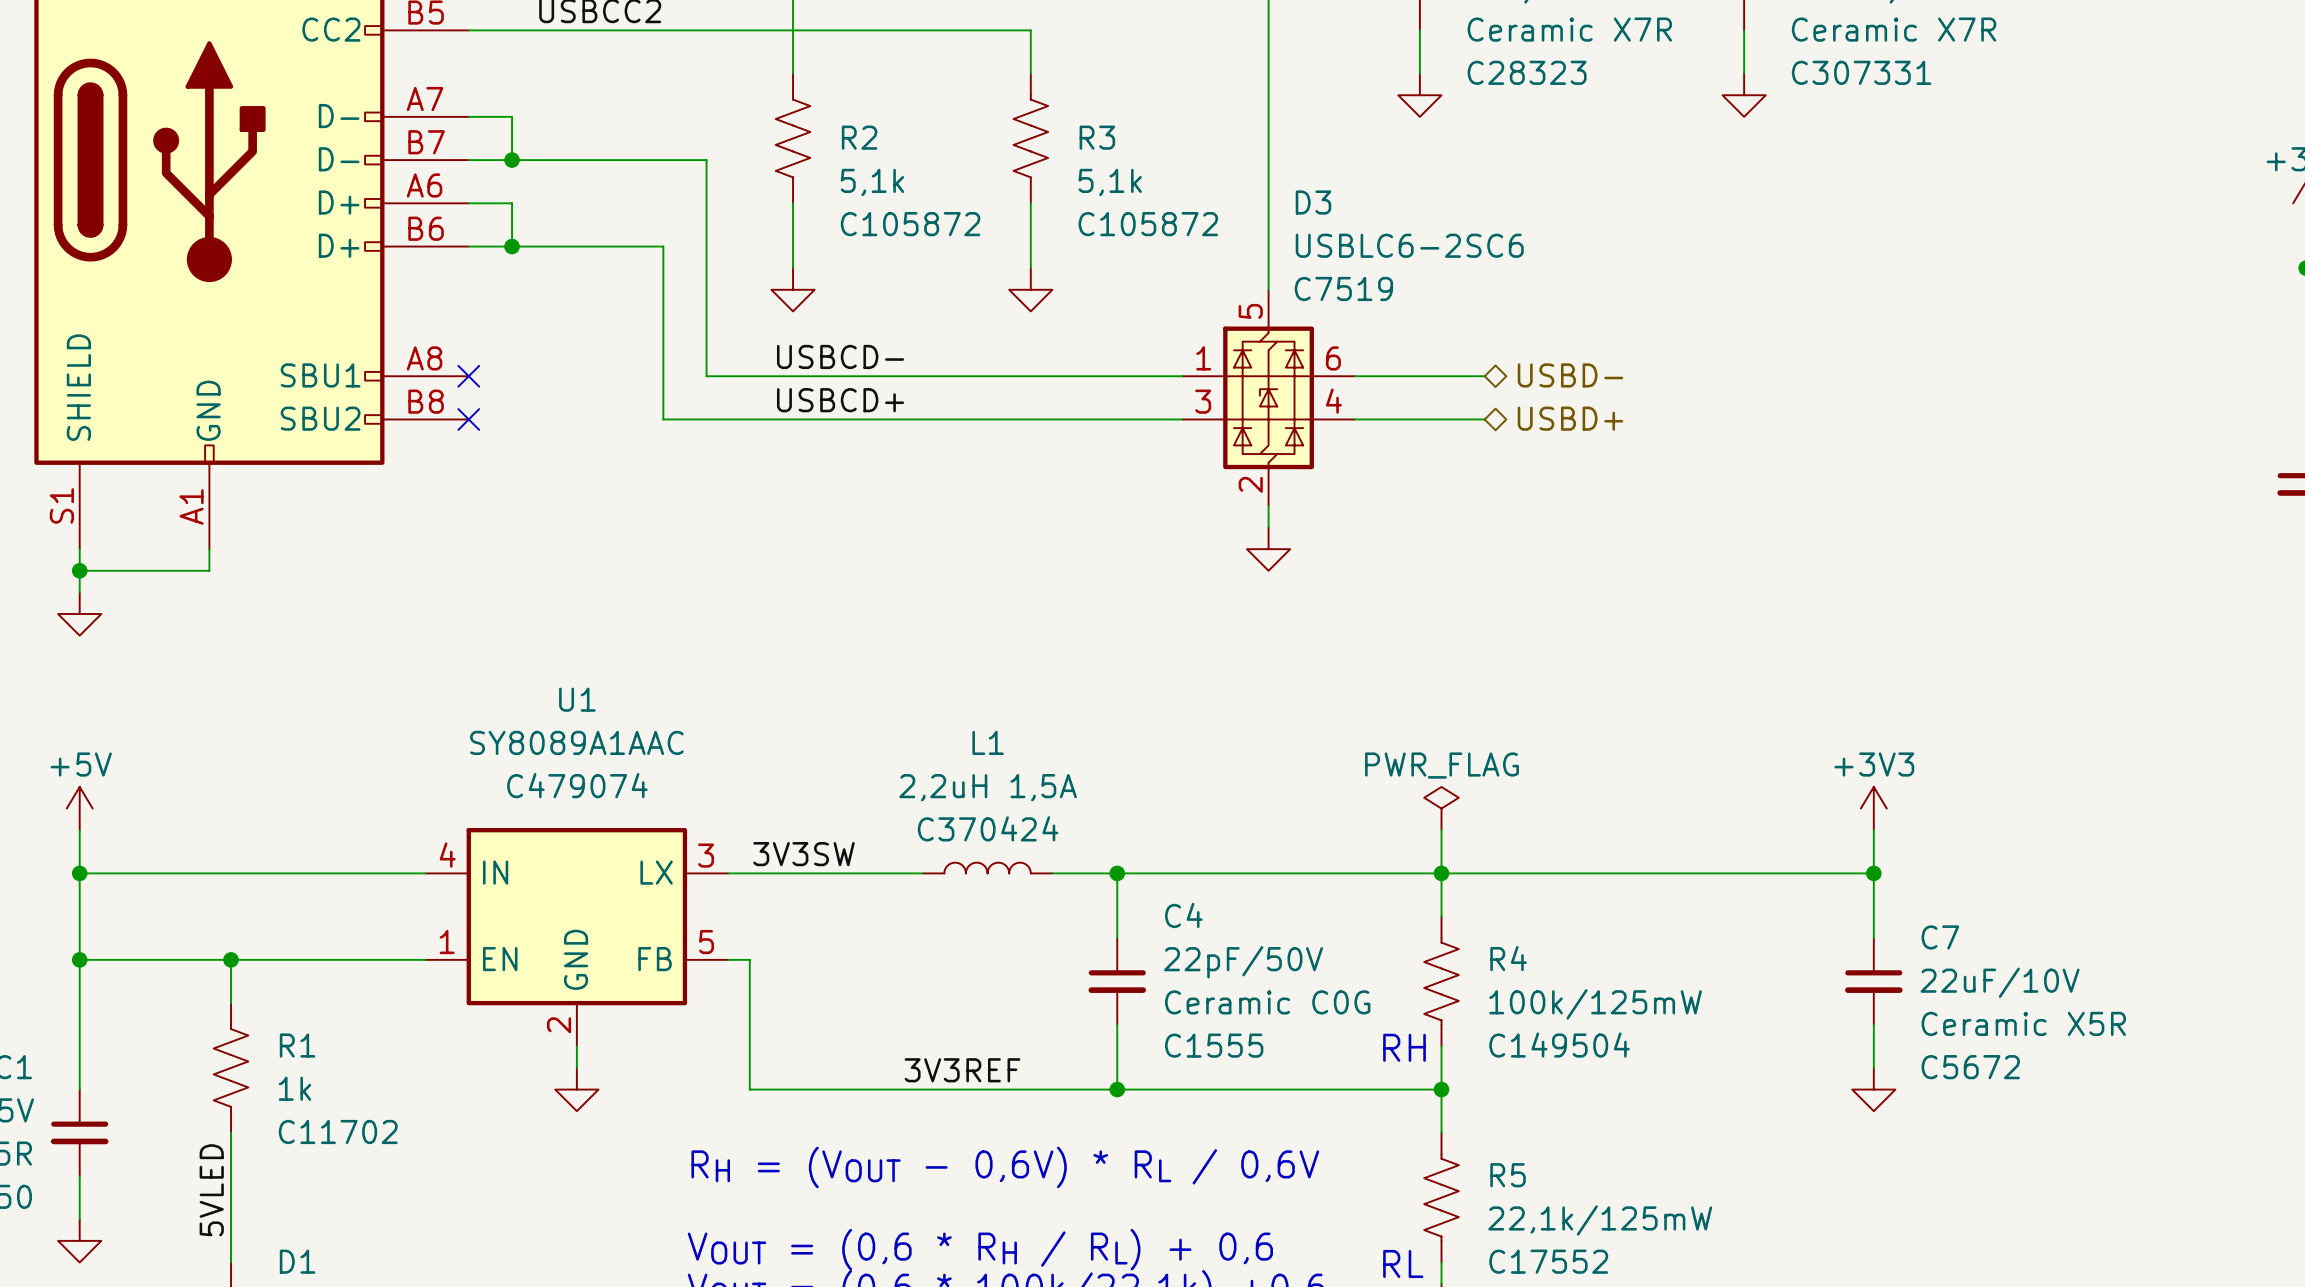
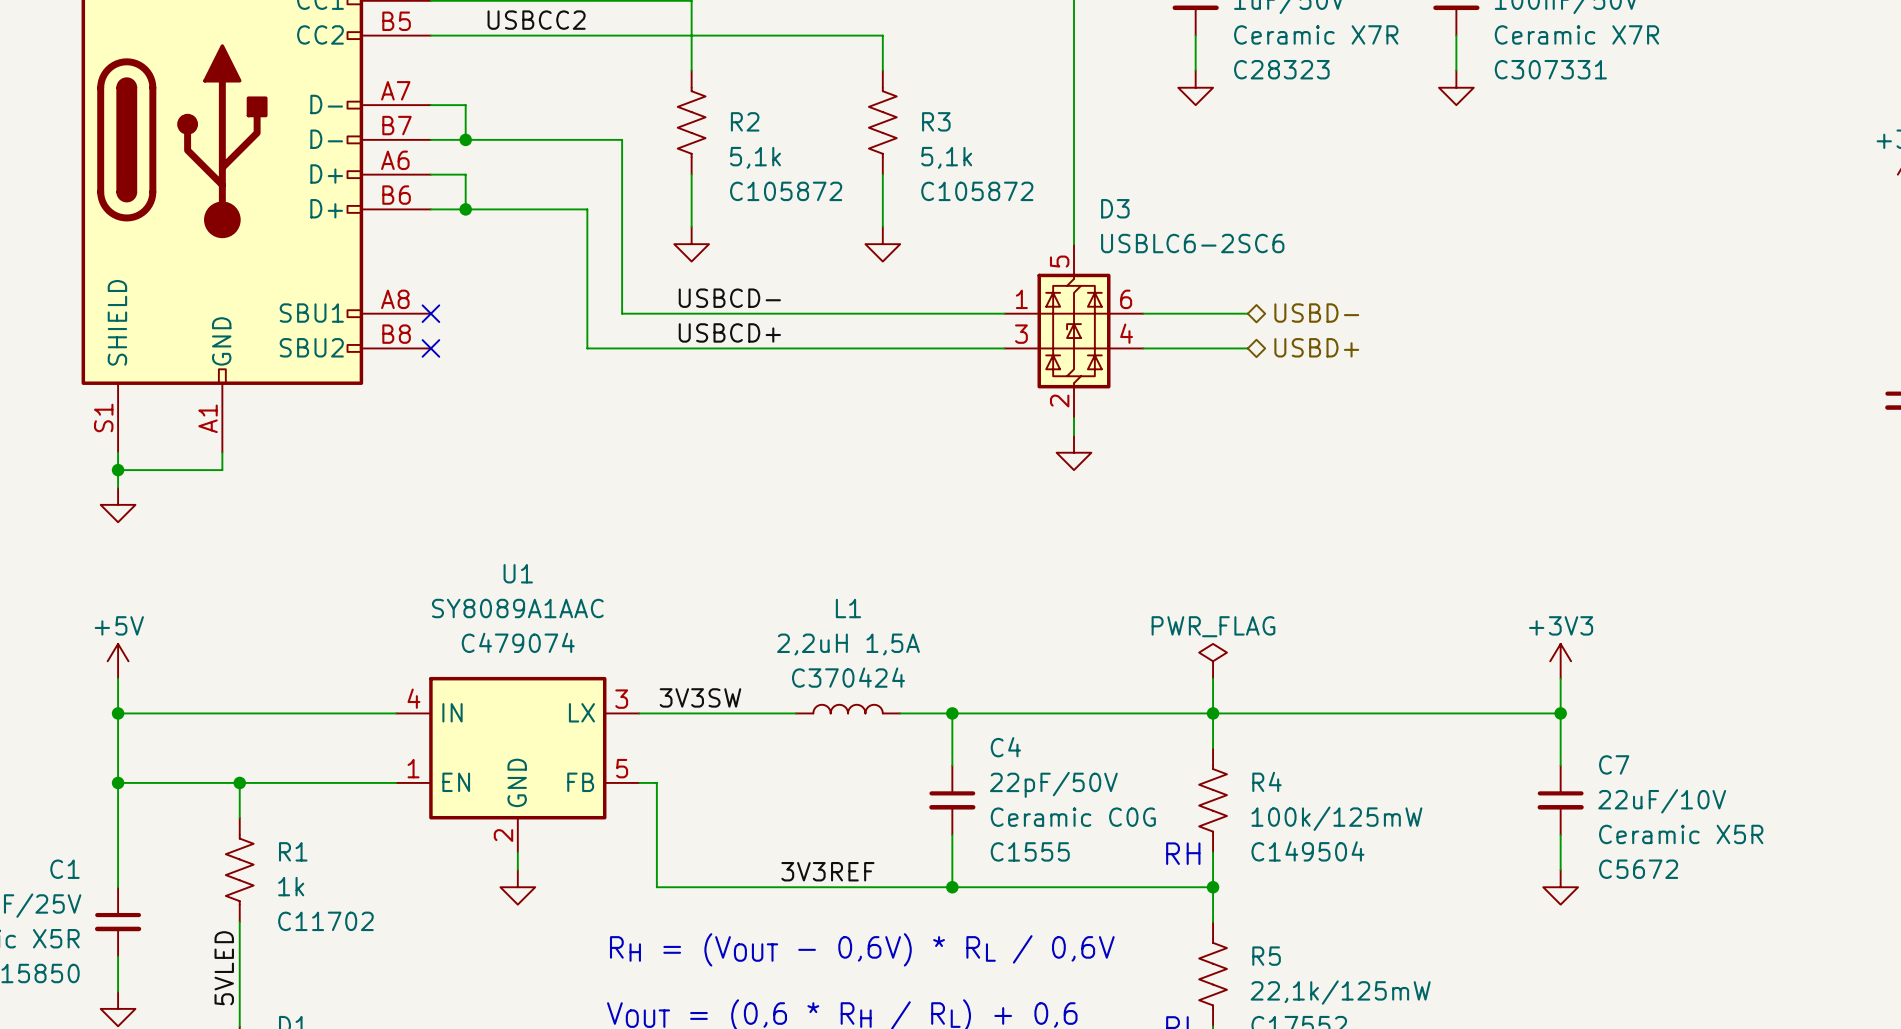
D3 name position: D3 (1313, 202) -> D3 (1115, 208)
D3 value position: USBLC6-2SC6 (1409, 245) -> USBLC6-2SC6 (1192, 243)
D3 text: C7519 (1343, 288) -> none

